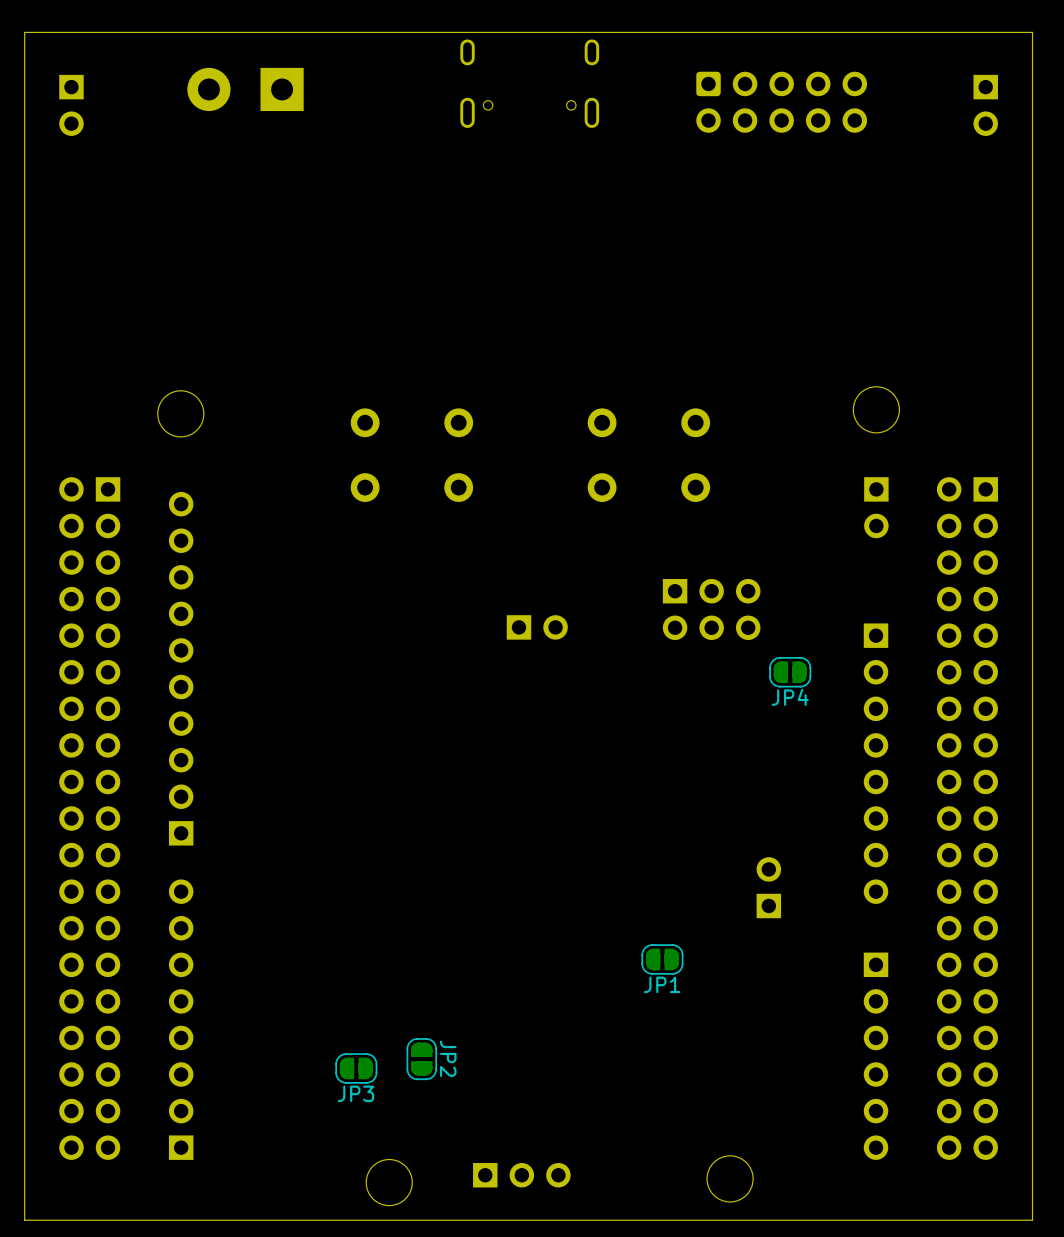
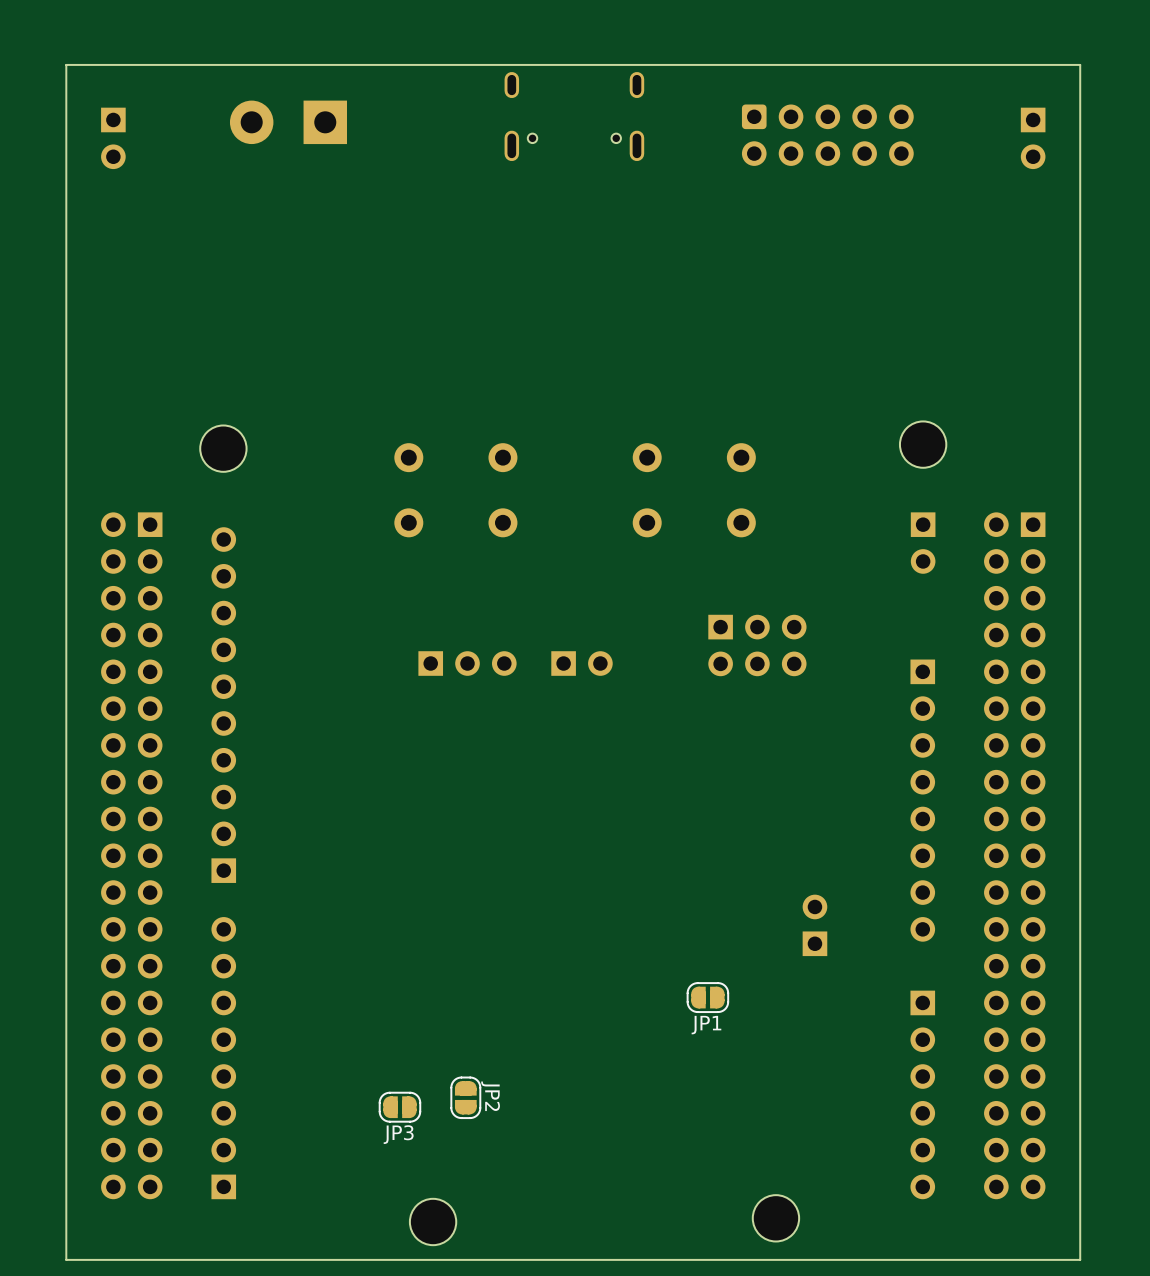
part: none -> (467, 663)
JP4: (790, 672) -> none
part: (521, 1175) -> none

